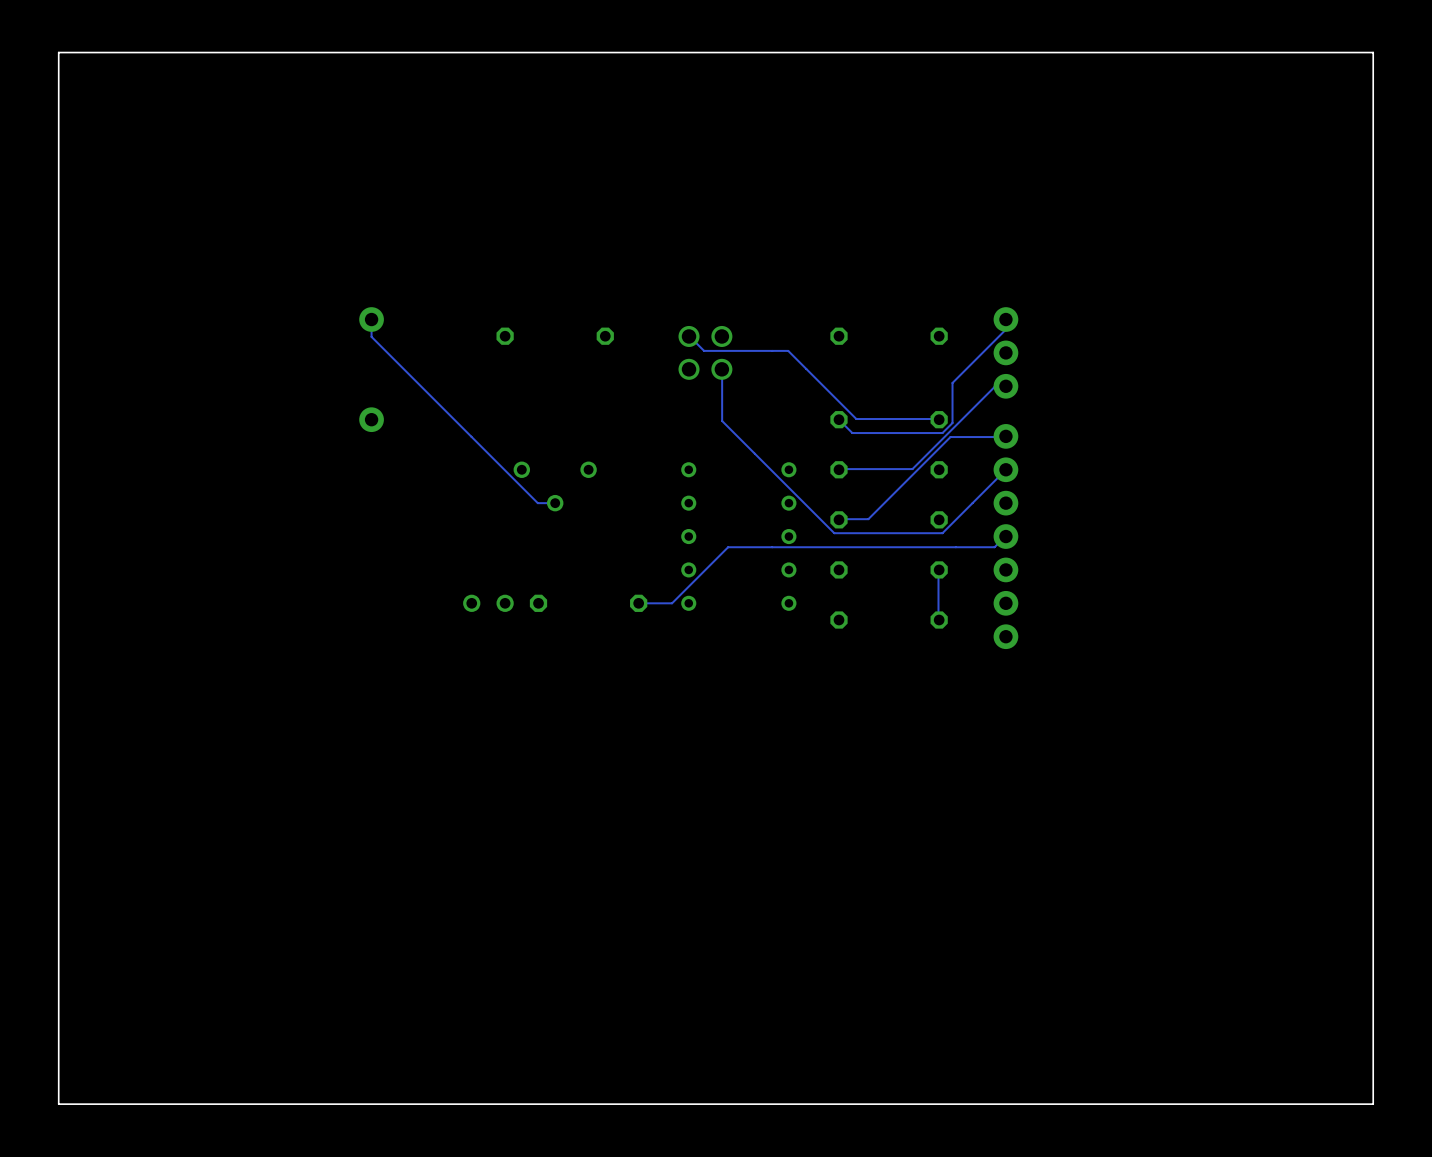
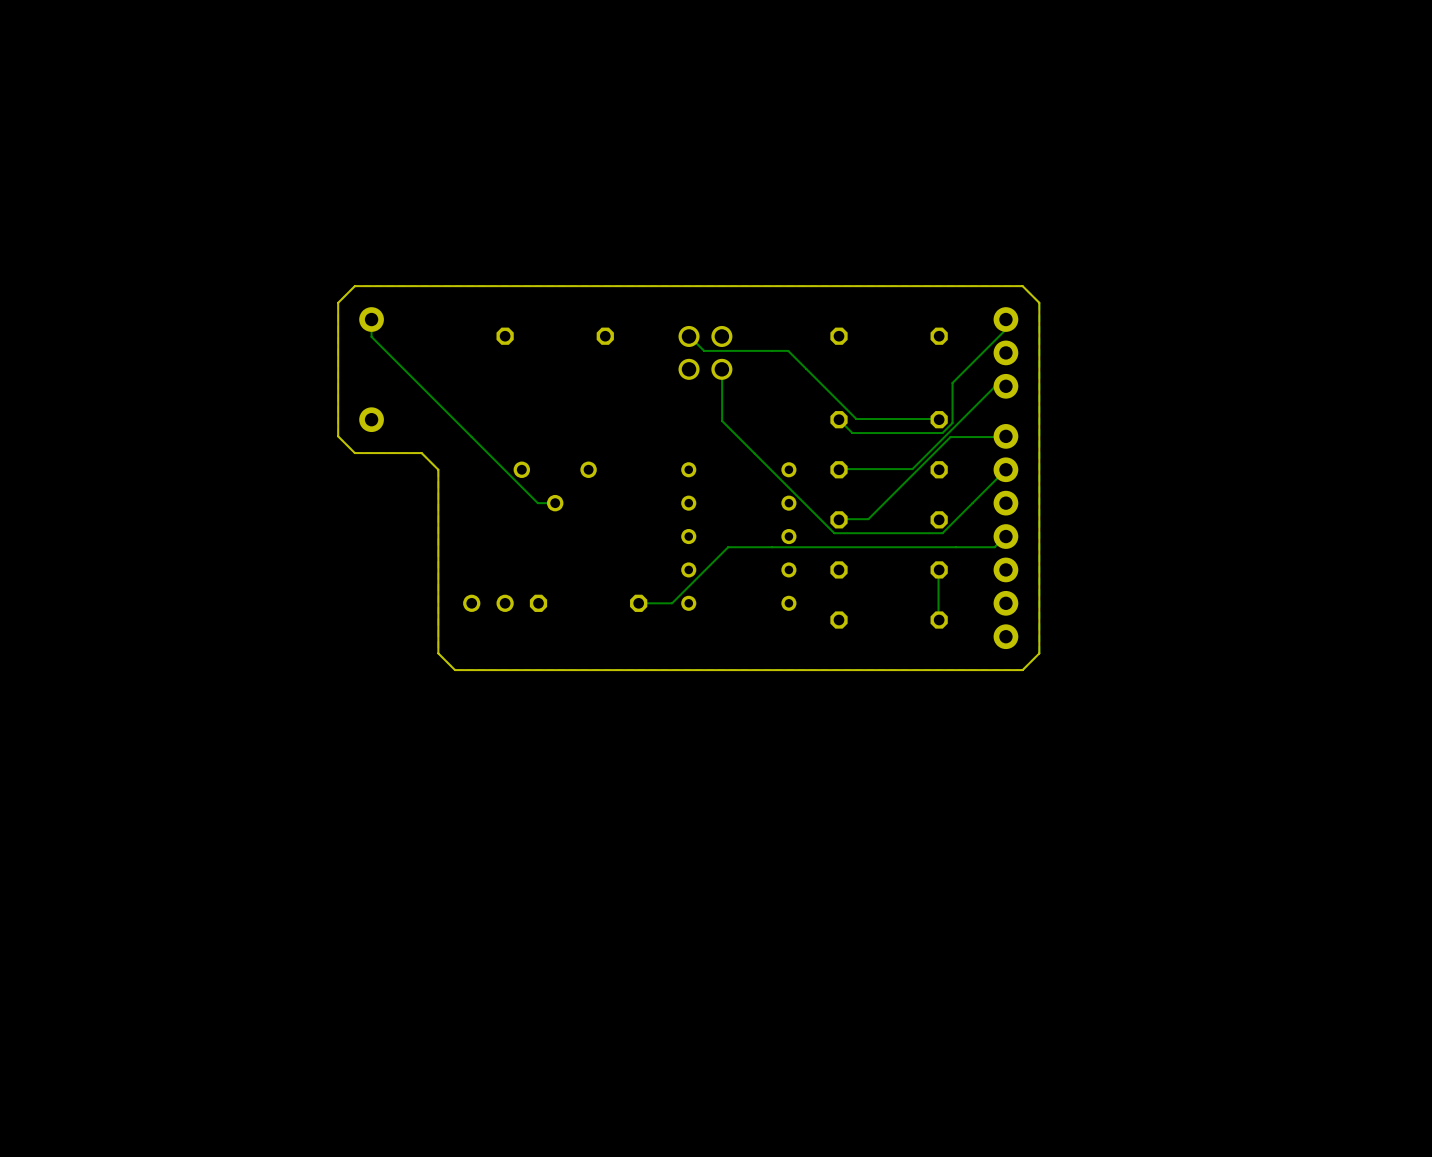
board edge: (1373, 52) (58, 52) (58, 1104) (1373, 1104) (1373, 52) -> none
board edge: none -> (1022, 286) (354, 286) (338, 302) (338, 436) (354, 453) (421, 453) (438, 469) (438, 653) (455, 670) (1022, 670) (1039, 653) (1039, 302) (1022, 286)

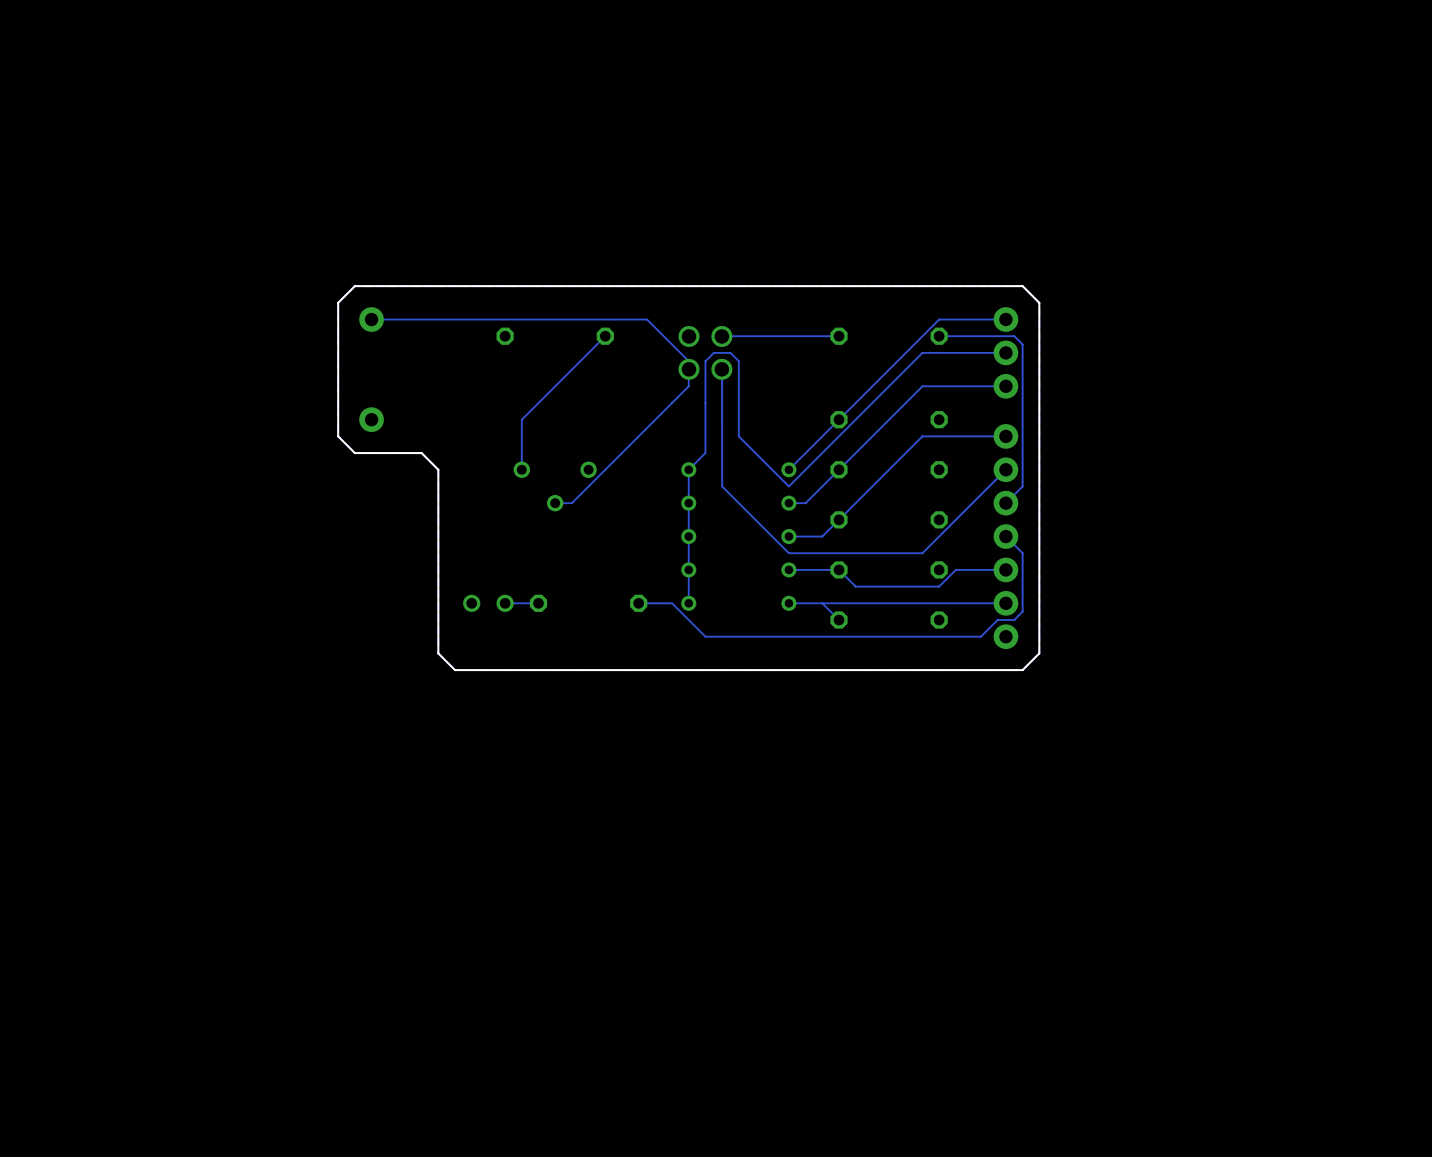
track: (371, 319) (371, 336) (537, 503) (555, 503) -> (371, 319) (647, 319) (688, 361) (688, 386) (571, 503) (555, 503)
track: (1005, 319) (1004, 330) (952, 382) (952, 423) (942, 433) (852, 433) (839, 419) -> (1005, 319) (939, 319) (788, 469)
track: none -> (605, 336) (521, 419) (521, 469)
track: (689, 336) (704, 350) (788, 350) (856, 419) (939, 419) -> none
track: none -> (839, 336) (721, 336)
track: none -> (939, 336) (1014, 336) (1022, 344) (1022, 486) (1005, 503)
track: none -> (1005, 352) (922, 352) (788, 486) (738, 436) (738, 361) (730, 352) (713, 352) (705, 361) (705, 453) (688, 469) (688, 603)
track: (1005, 386) (994, 386) (912, 469) (839, 469) -> (1005, 386) (922, 386) (805, 503) (788, 503)
track: (722, 421) (834, 533) (942, 533) -> (722, 421) (722, 486) (788, 553) (922, 553) (942, 533)
track: (1005, 436) (950, 437) (868, 519) (839, 519) -> (1005, 436) (922, 436) (822, 536) (788, 536)
track: (1005, 536) (994, 547) (728, 547) (672, 603) -> (1005, 536) (1022, 553) (1022, 611) (1014, 620) (997, 620) (980, 636) (705, 636) (672, 603)
track: (939, 569) (939, 620) -> none
track: none -> (1005, 569) (955, 569) (939, 586) (855, 586) (839, 569) (788, 569)
track: none -> (538, 603) (505, 603)
track: none -> (822, 603) (839, 620)
track: none -> (1005, 603) (788, 603)

